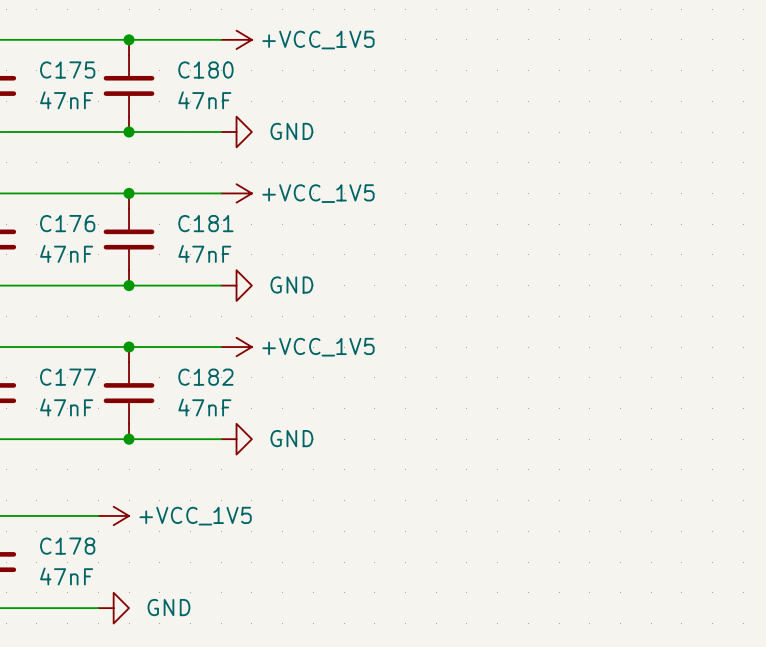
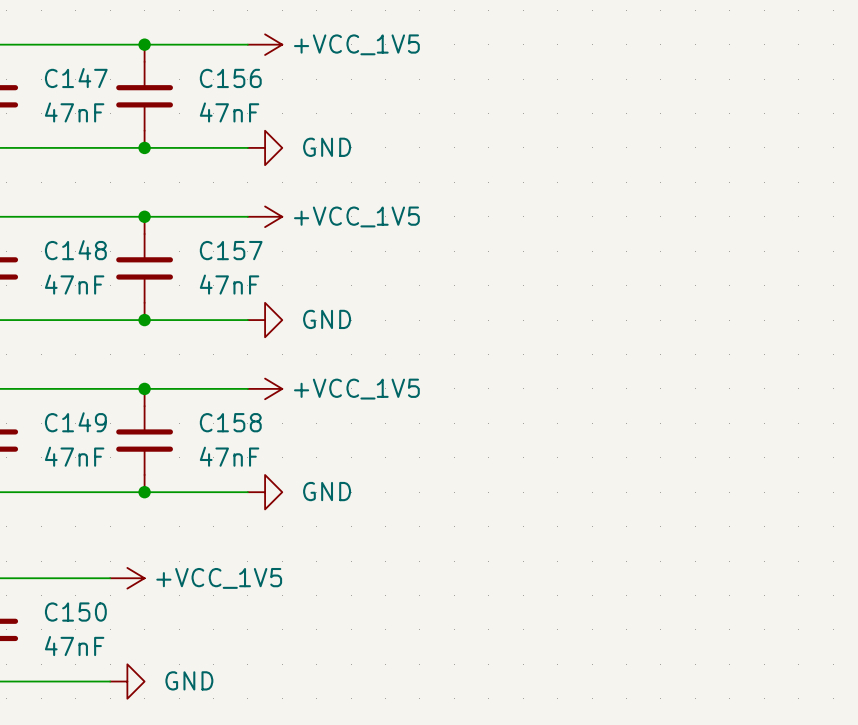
C175 name: C175 (67, 69) -> C147 (76, 78)
C180 name: C180 (205, 69) -> C156 (230, 78)
C176 name: C176 (67, 223) -> C148 (75, 250)
C181 name: C181 (205, 223) -> C157 (231, 250)
C177 name: C177 (68, 377) -> C149 (75, 422)
C182 name: C182 (205, 377) -> C158 (230, 422)
C178 name: C178 (67, 546) -> C150 (75, 612)

